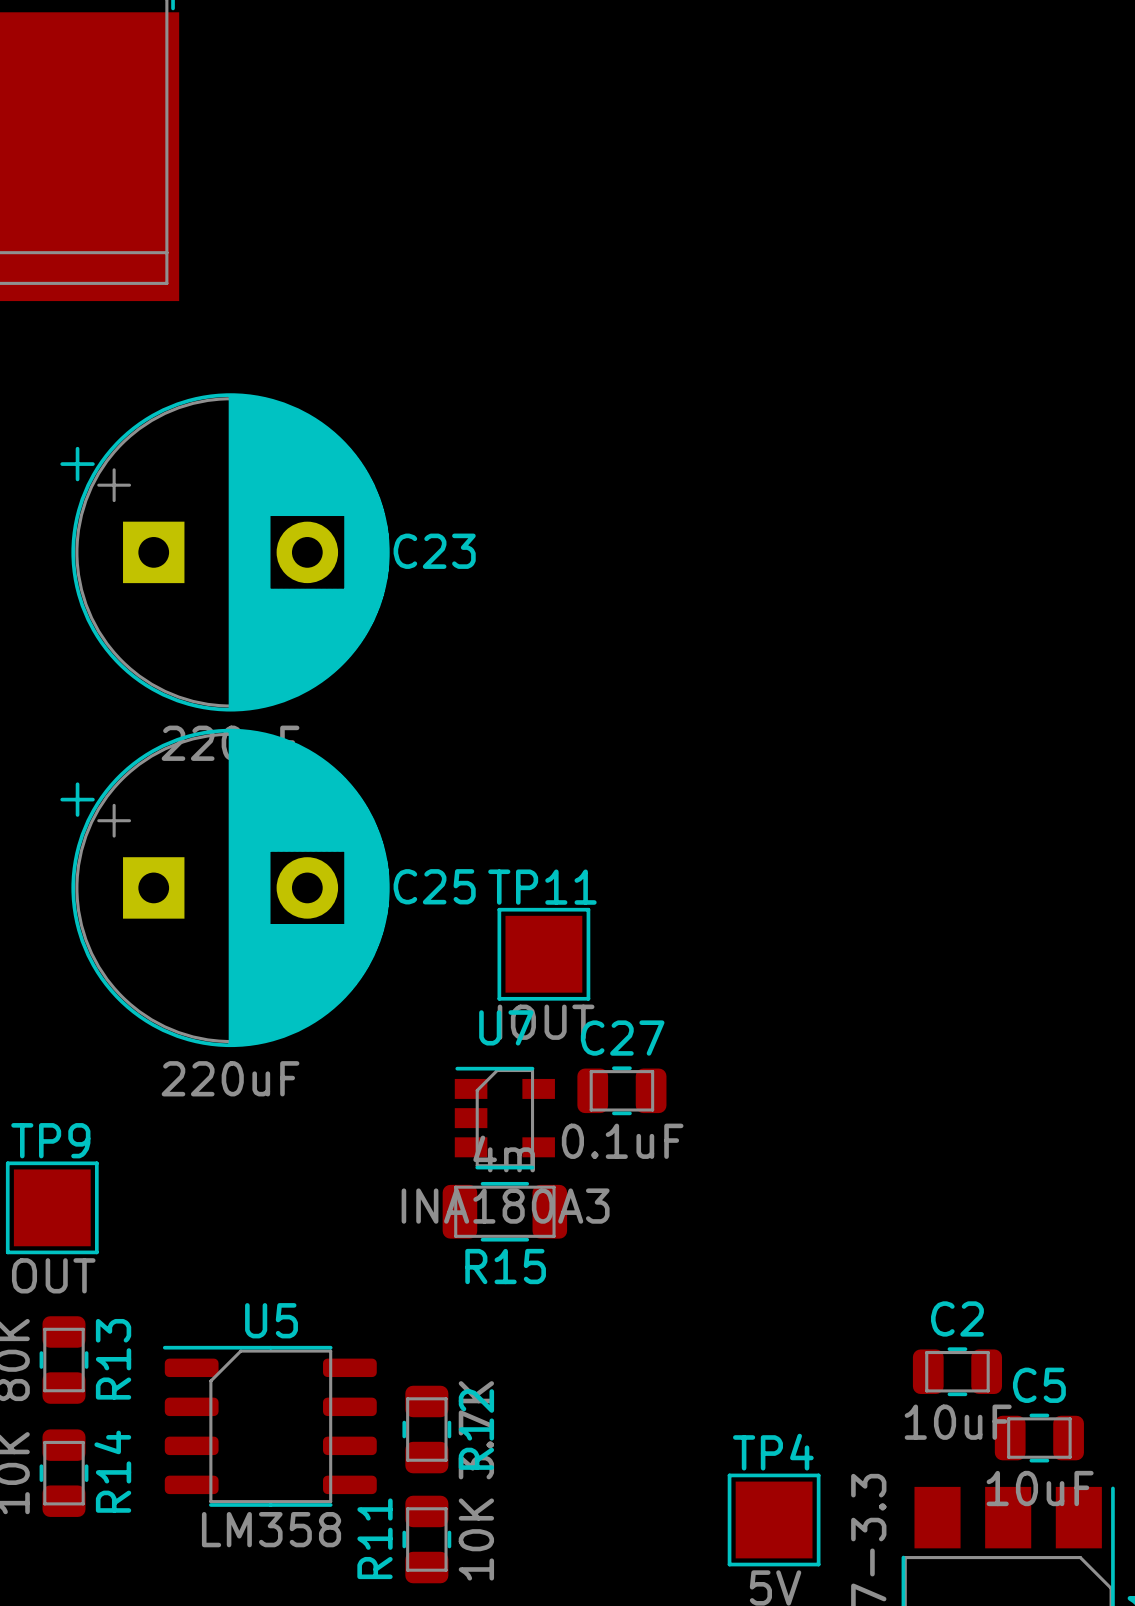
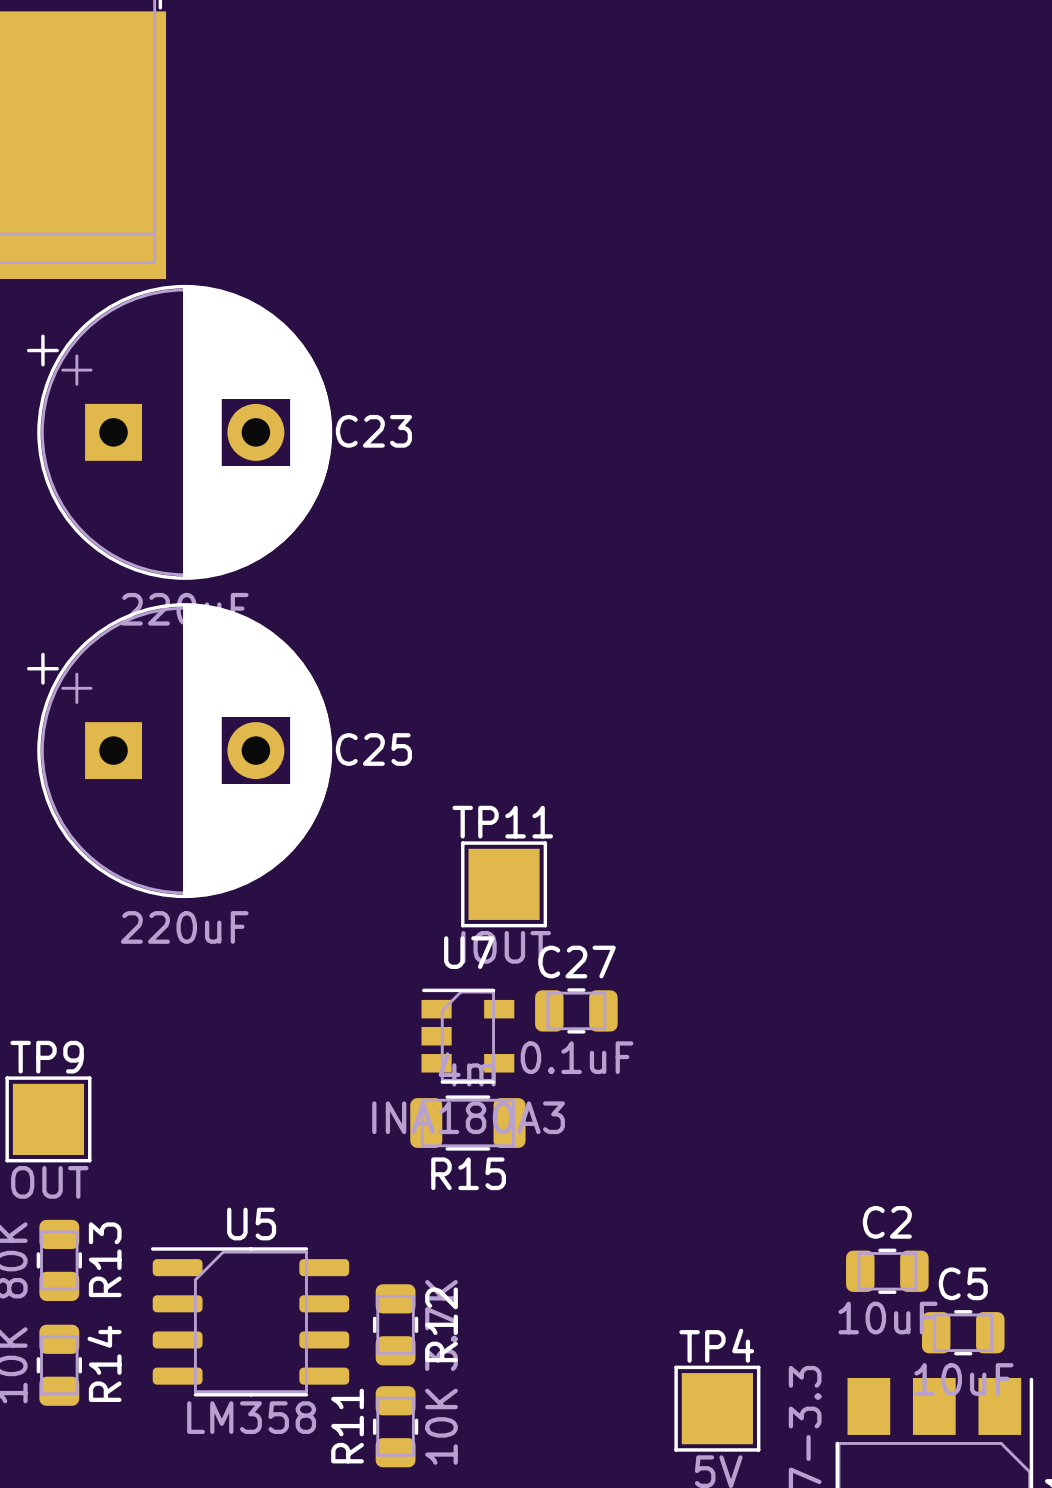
C23 position: (225, 552) -> (179, 432)
C25 position: (225, 887) -> (179, 750)

